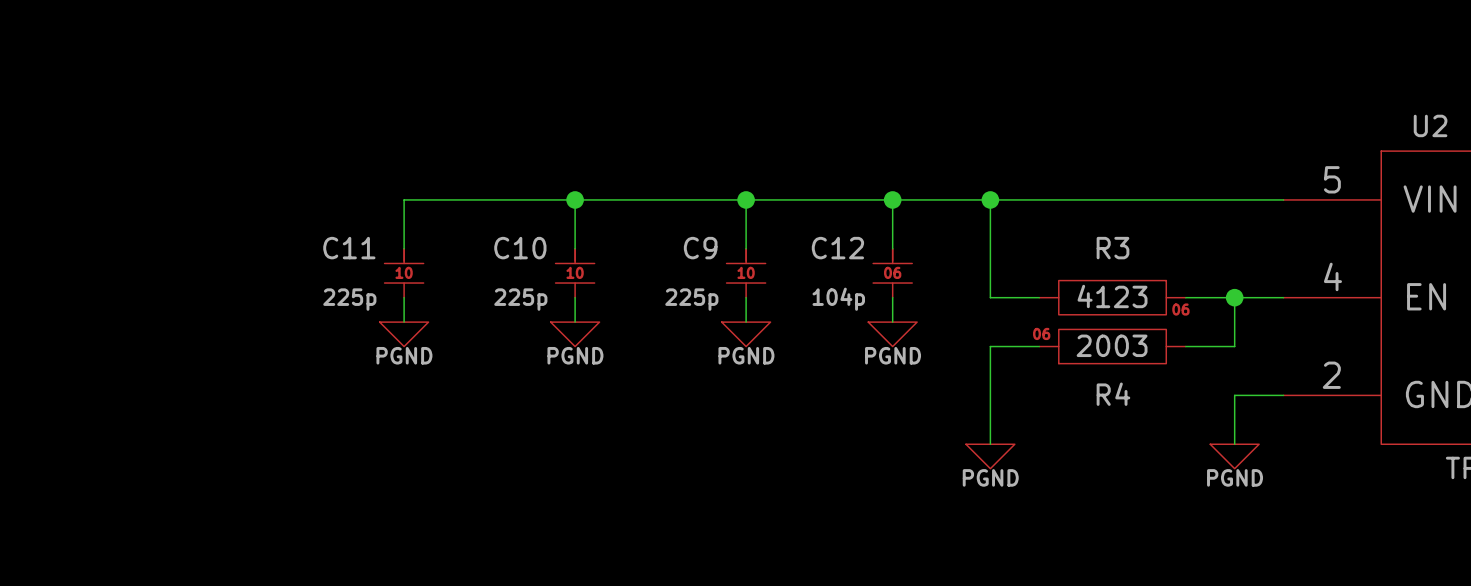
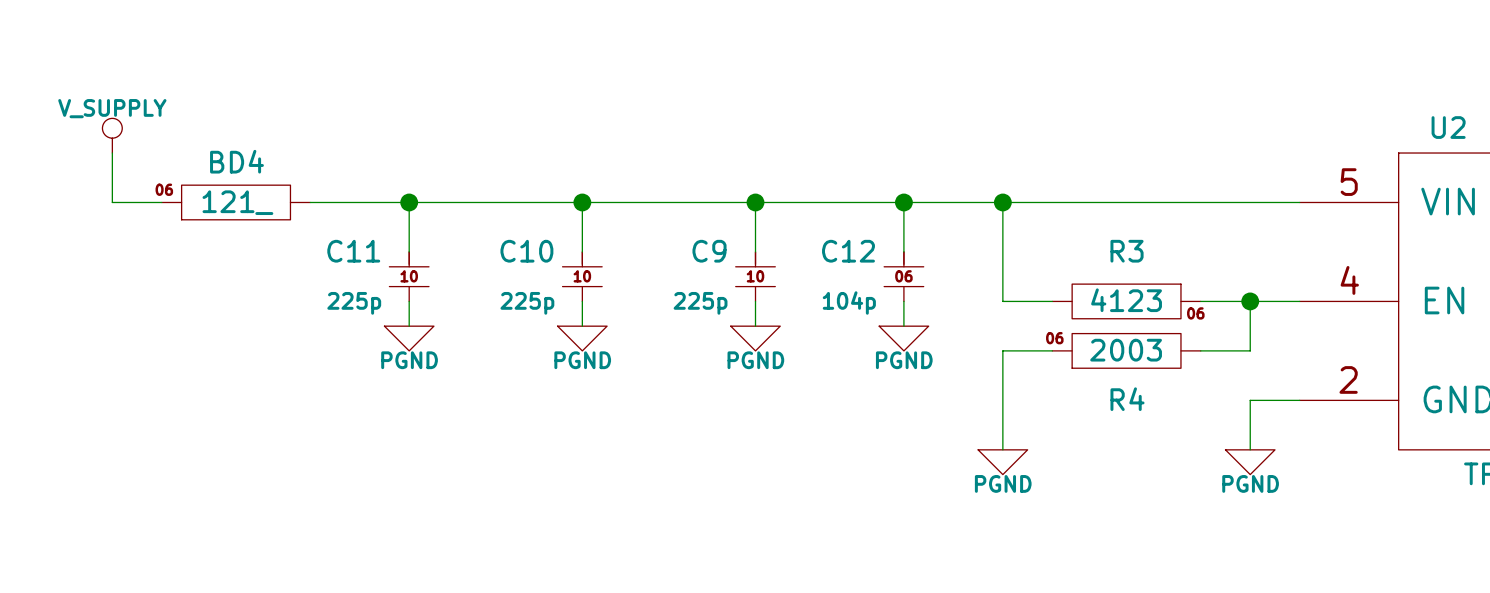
power symbol: none -> V_SUPPLY (112, 135)
wire: none -> (112, 153) (112, 202) (161, 202)
BD4: none -> (236, 202)
wire: none -> (310, 202) (409, 202)
junction: none -> (409, 202)

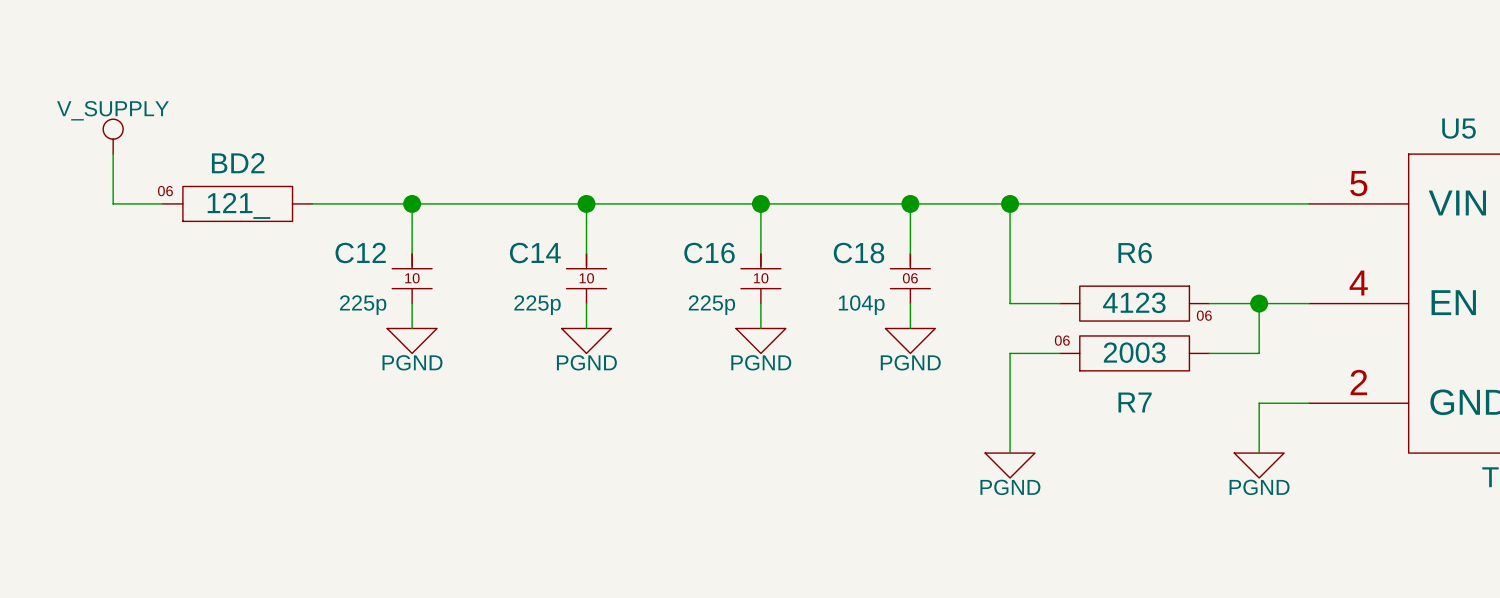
U2 name: U2 (1448, 127) -> U5 (1459, 128)
BD4 name: BD4 (236, 161) -> BD2 (238, 163)
C11 name: C11 (353, 251) -> C12 (360, 253)
C10 name: C10 (526, 251) -> C14 (535, 253)
C9 name: C9 (709, 251) -> C16 (709, 253)
C12 name: C12 (848, 251) -> C18 (859, 253)
R3 name: R3 (1127, 251) -> R6 (1135, 253)
R4 name: R4 (1127, 399) -> R7 (1135, 402)

